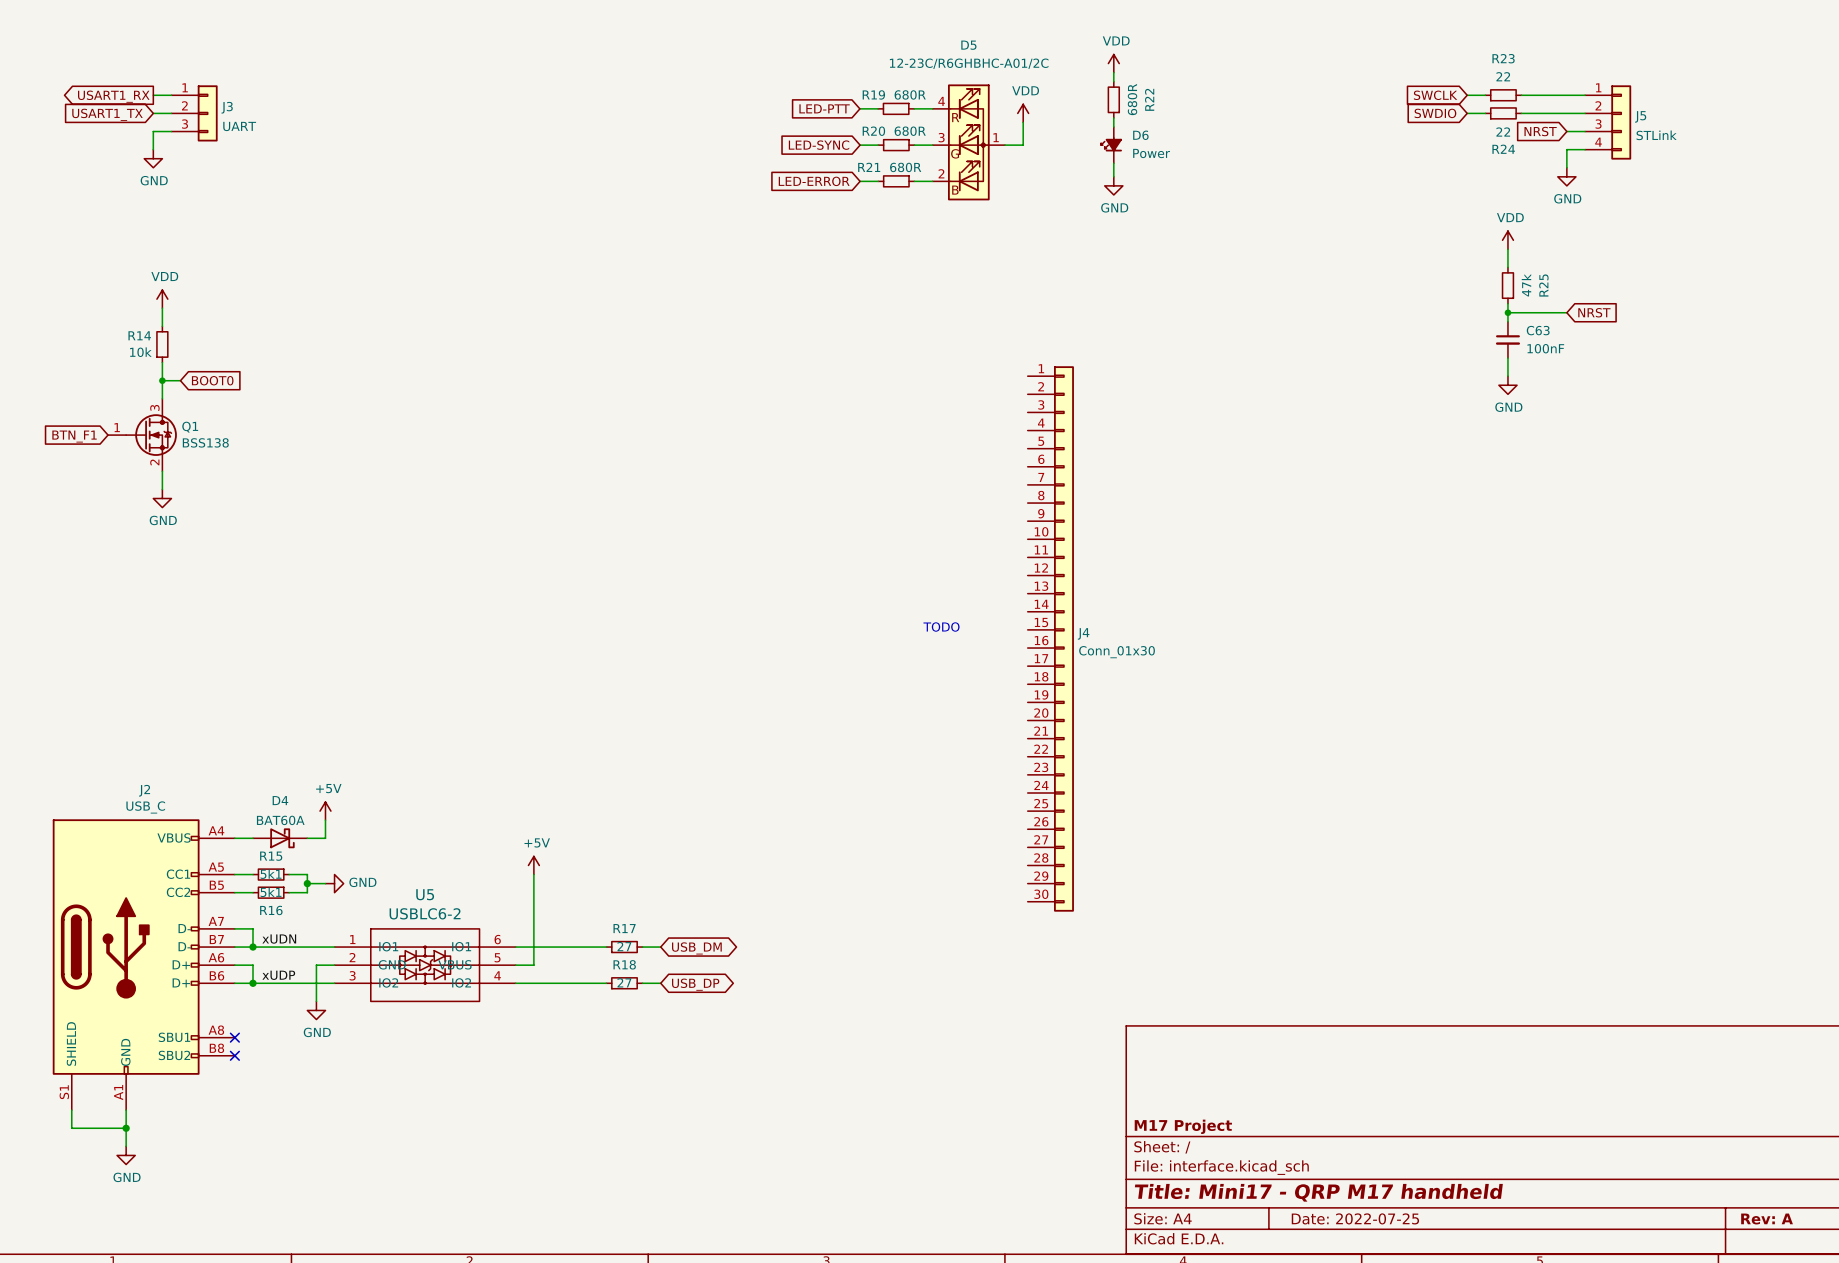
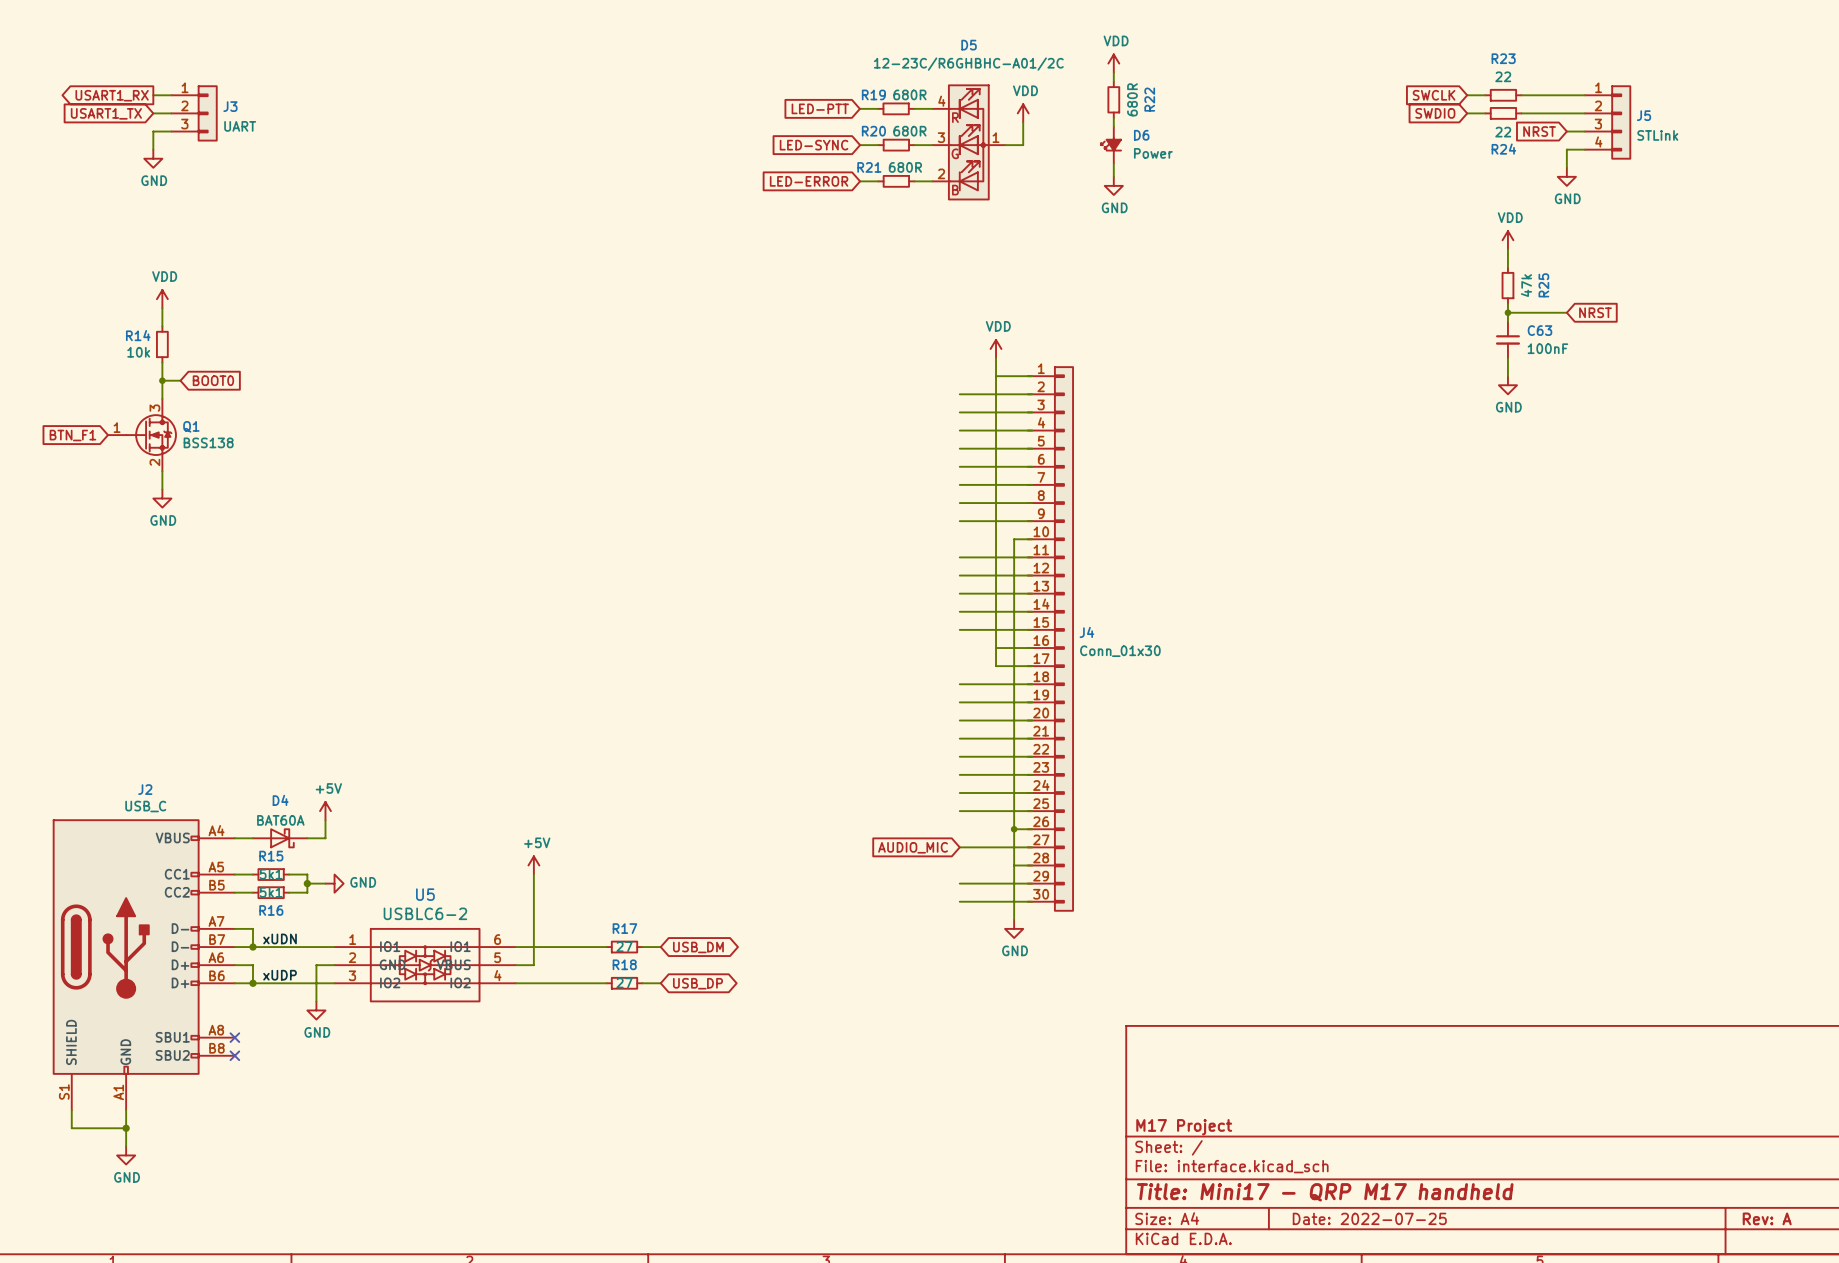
power symbol: none -> VDD (996, 349)
wire: none -> (996, 358) (996, 666) (1032, 666)
wire: none -> (996, 376) (1032, 376)
wire: none -> (959, 394) (1032, 394)
wire: none -> (959, 412) (1032, 412)
wire: none -> (959, 430) (1032, 430)
wire: none -> (959, 448) (1032, 448)
wire: none -> (959, 466) (1032, 466)
wire: none -> (959, 484) (1032, 484)
wire: none -> (959, 503) (1032, 503)
wire: none -> (959, 521) (1032, 521)
wire: none -> (1032, 539) (1014, 539) (1014, 919)
wire: none -> (959, 557) (1032, 557)
wire: none -> (959, 575) (1032, 575)
wire: none -> (959, 593) (1032, 593)
wire: none -> (959, 611) (1032, 611)
text: TODO (941, 627) -> none
wire: none -> (959, 629) (1032, 629)
wire: none -> (996, 648) (1032, 648)
wire: none -> (959, 684) (1032, 684)
wire: none -> (959, 702) (1032, 702)
wire: none -> (959, 720) (1032, 720)
wire: none -> (959, 738) (1032, 738)
wire: none -> (959, 756) (1032, 756)
wire: none -> (959, 774) (1032, 774)
wire: none -> (959, 793) (1032, 793)
wire: none -> (959, 811) (1032, 811)
wire: none -> (1014, 829) (1032, 829)
junction: none -> (1014, 829)
wire: none -> (959, 847) (1032, 847)
global label: none -> AUDIO_MIC (913, 847)
wire: none -> (1014, 865) (1032, 865)
wire: none -> (959, 883) (1032, 883)
wire: none -> (959, 901) (1032, 901)
power symbol: none -> GND (1014, 928)

